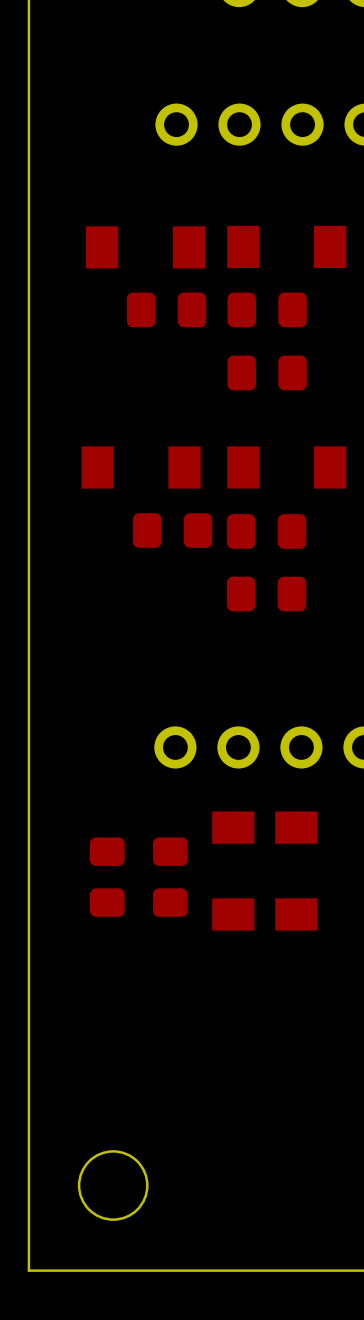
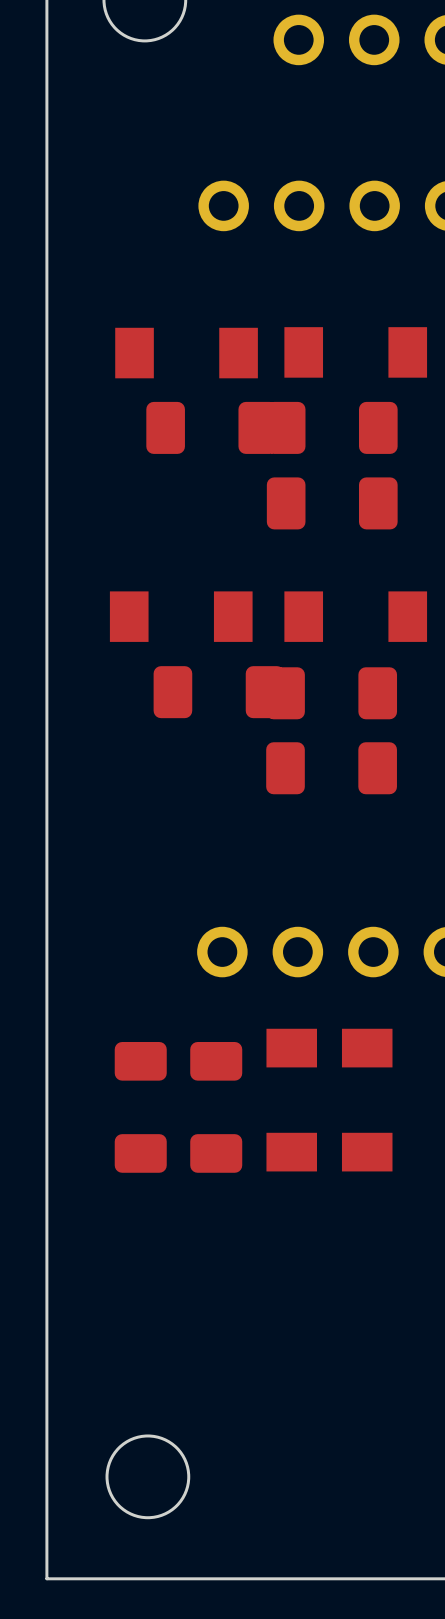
part footprint: [126, 292, 207, 328] -> [146, 401, 278, 454]
part footprint: [227, 292, 307, 328] -> [266, 401, 398, 454]
part footprint: [227, 355, 307, 391] -> [266, 477, 398, 530]
part footprint: [132, 513, 213, 548] -> [153, 666, 285, 719]
part footprint: [226, 514, 307, 549] -> [266, 667, 398, 720]
part footprint: [226, 576, 307, 612] -> [266, 742, 397, 795]
part footprint: [89, 837, 125, 917] -> [114, 1041, 167, 1173]
part footprint: [152, 837, 188, 917] -> [190, 1041, 243, 1173]

